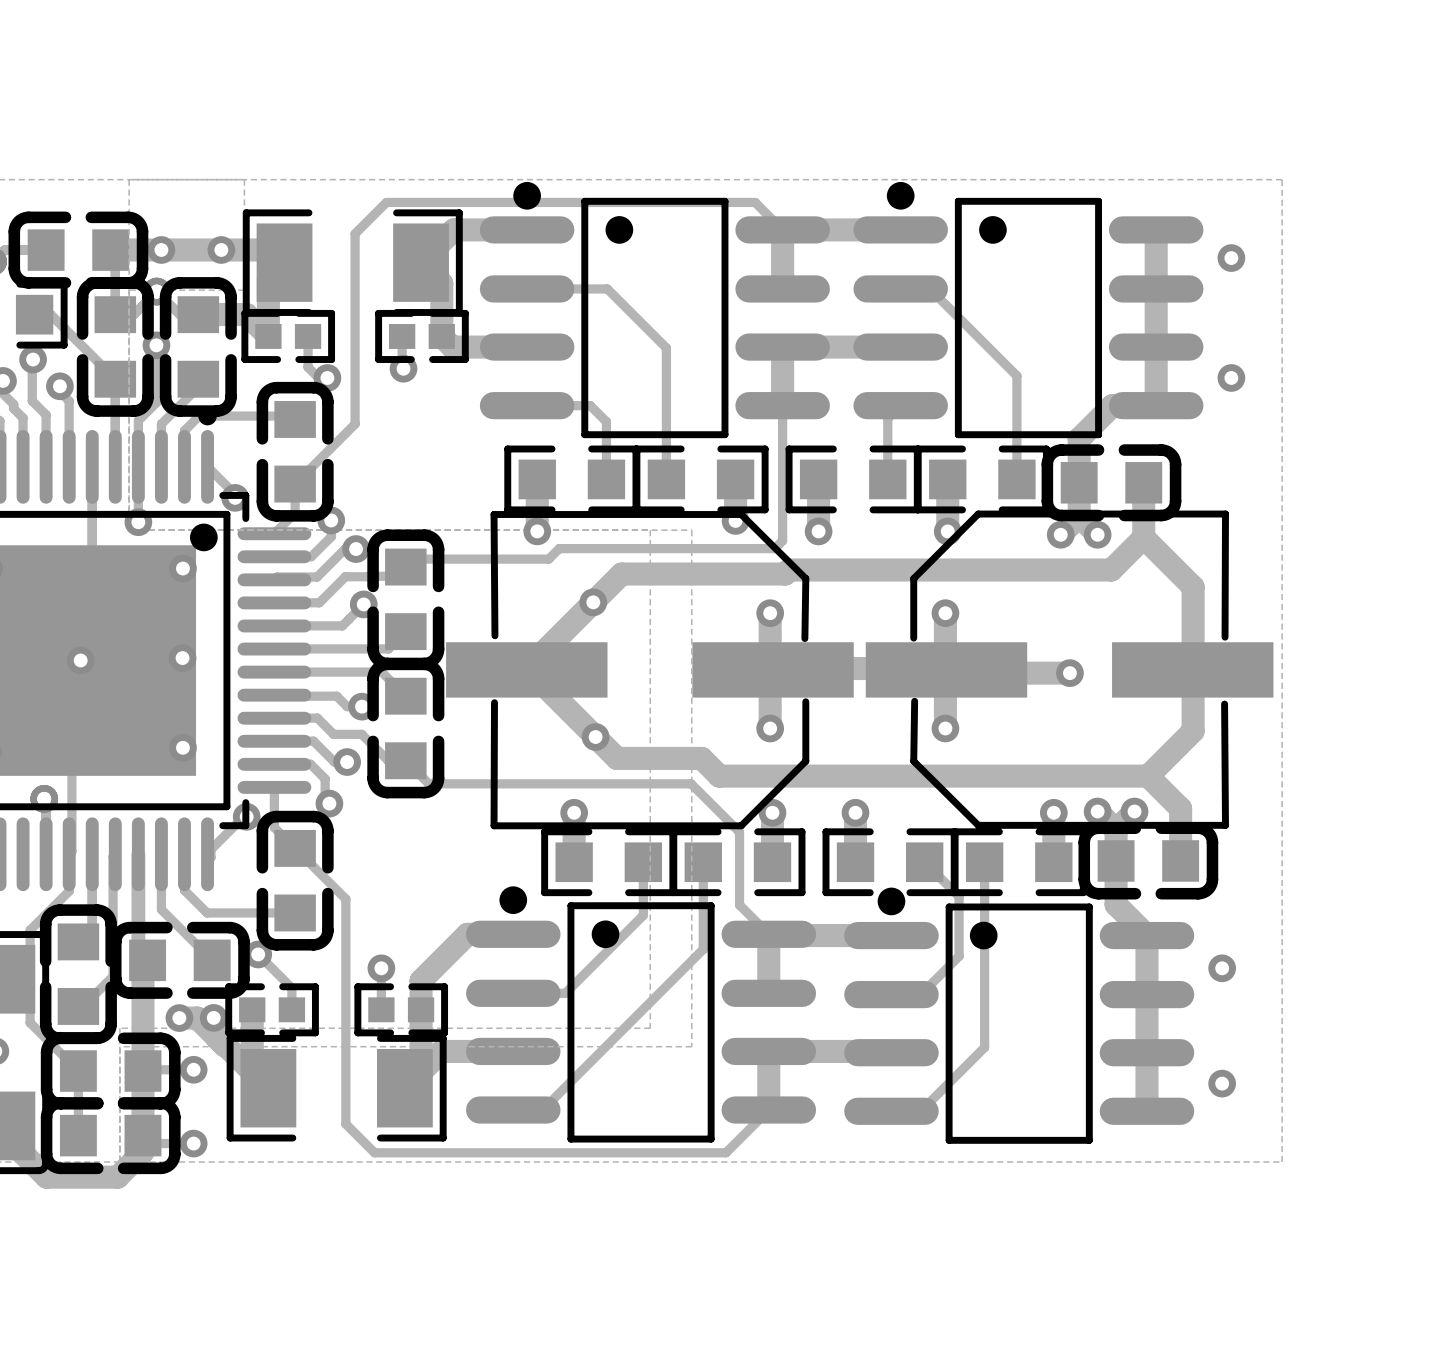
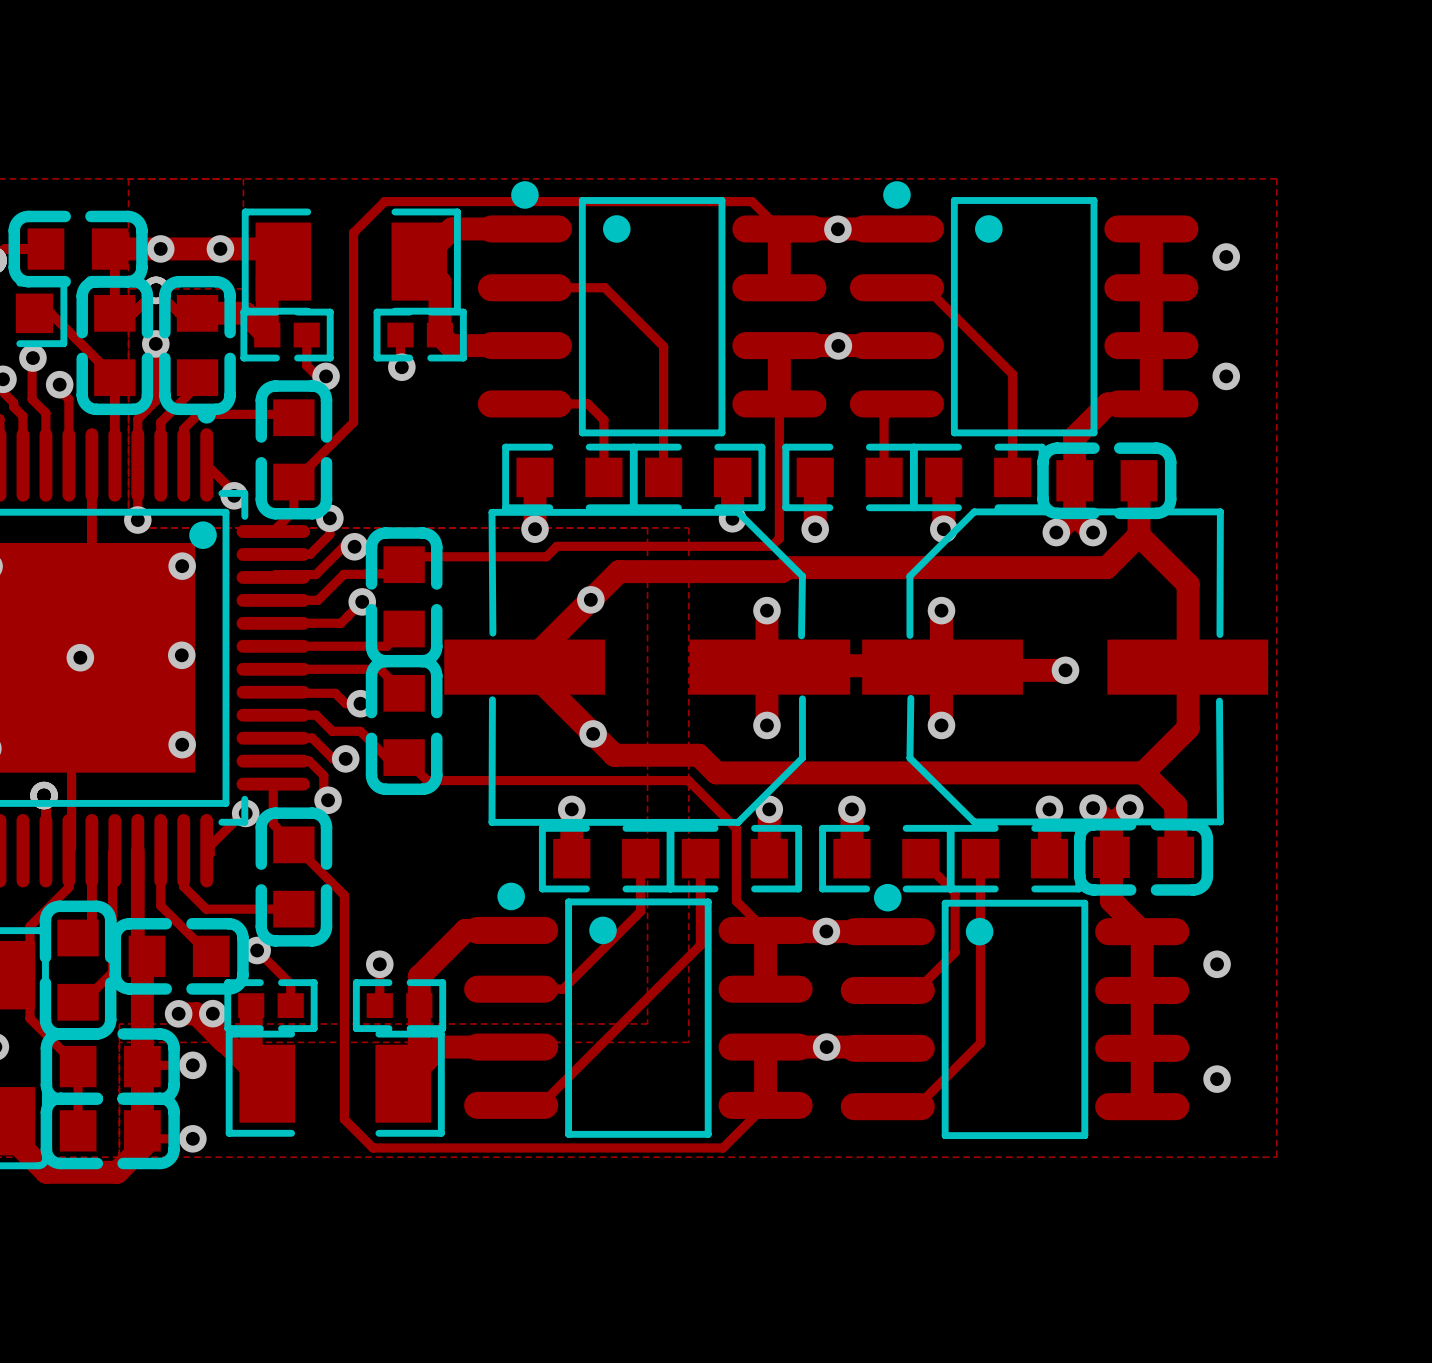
via: none -> (837, 229)
via: none -> (838, 345)
via: none -> (826, 931)
via: none -> (826, 1047)

